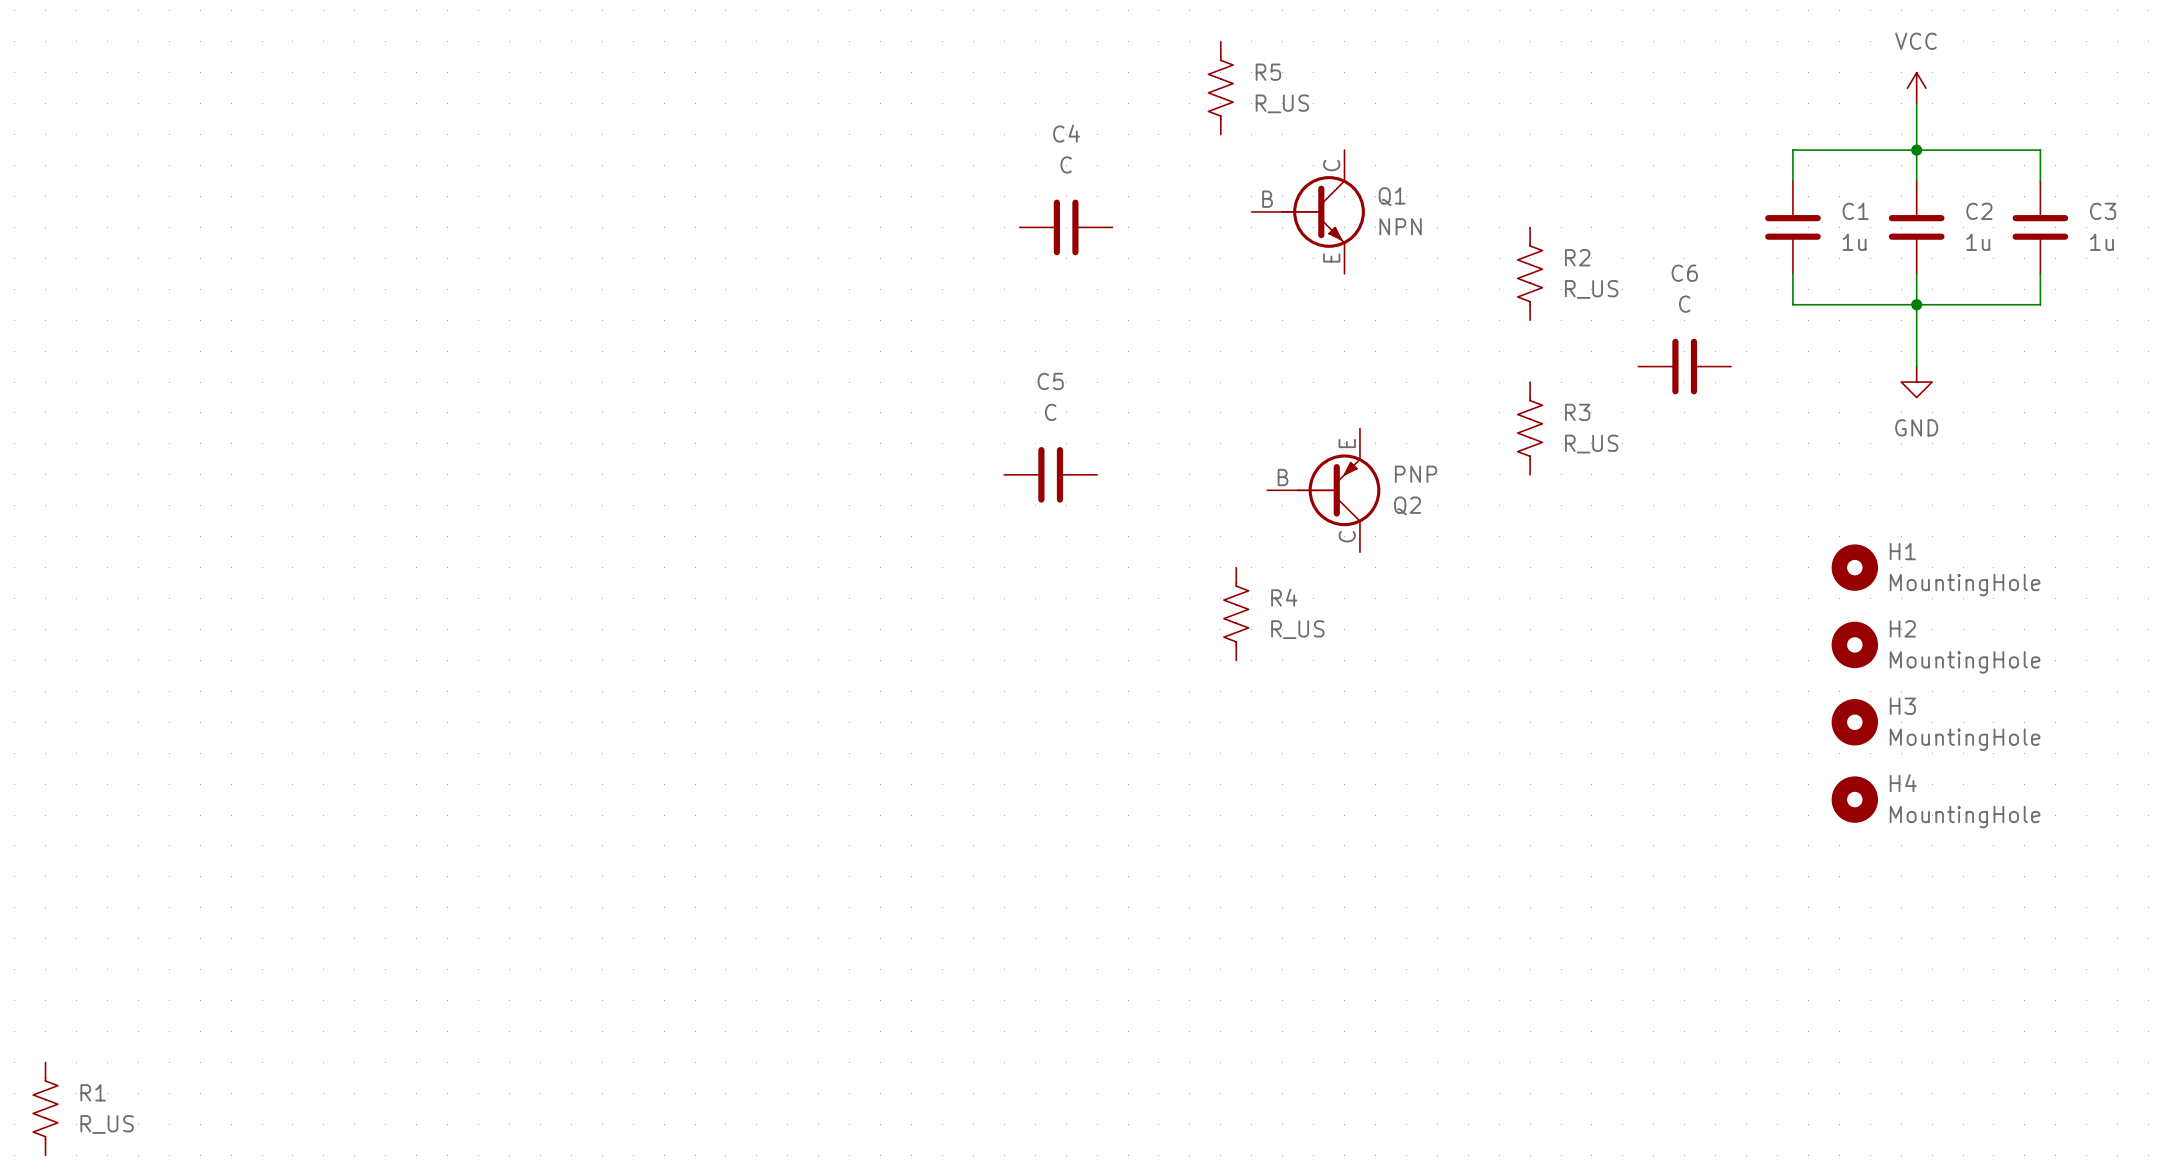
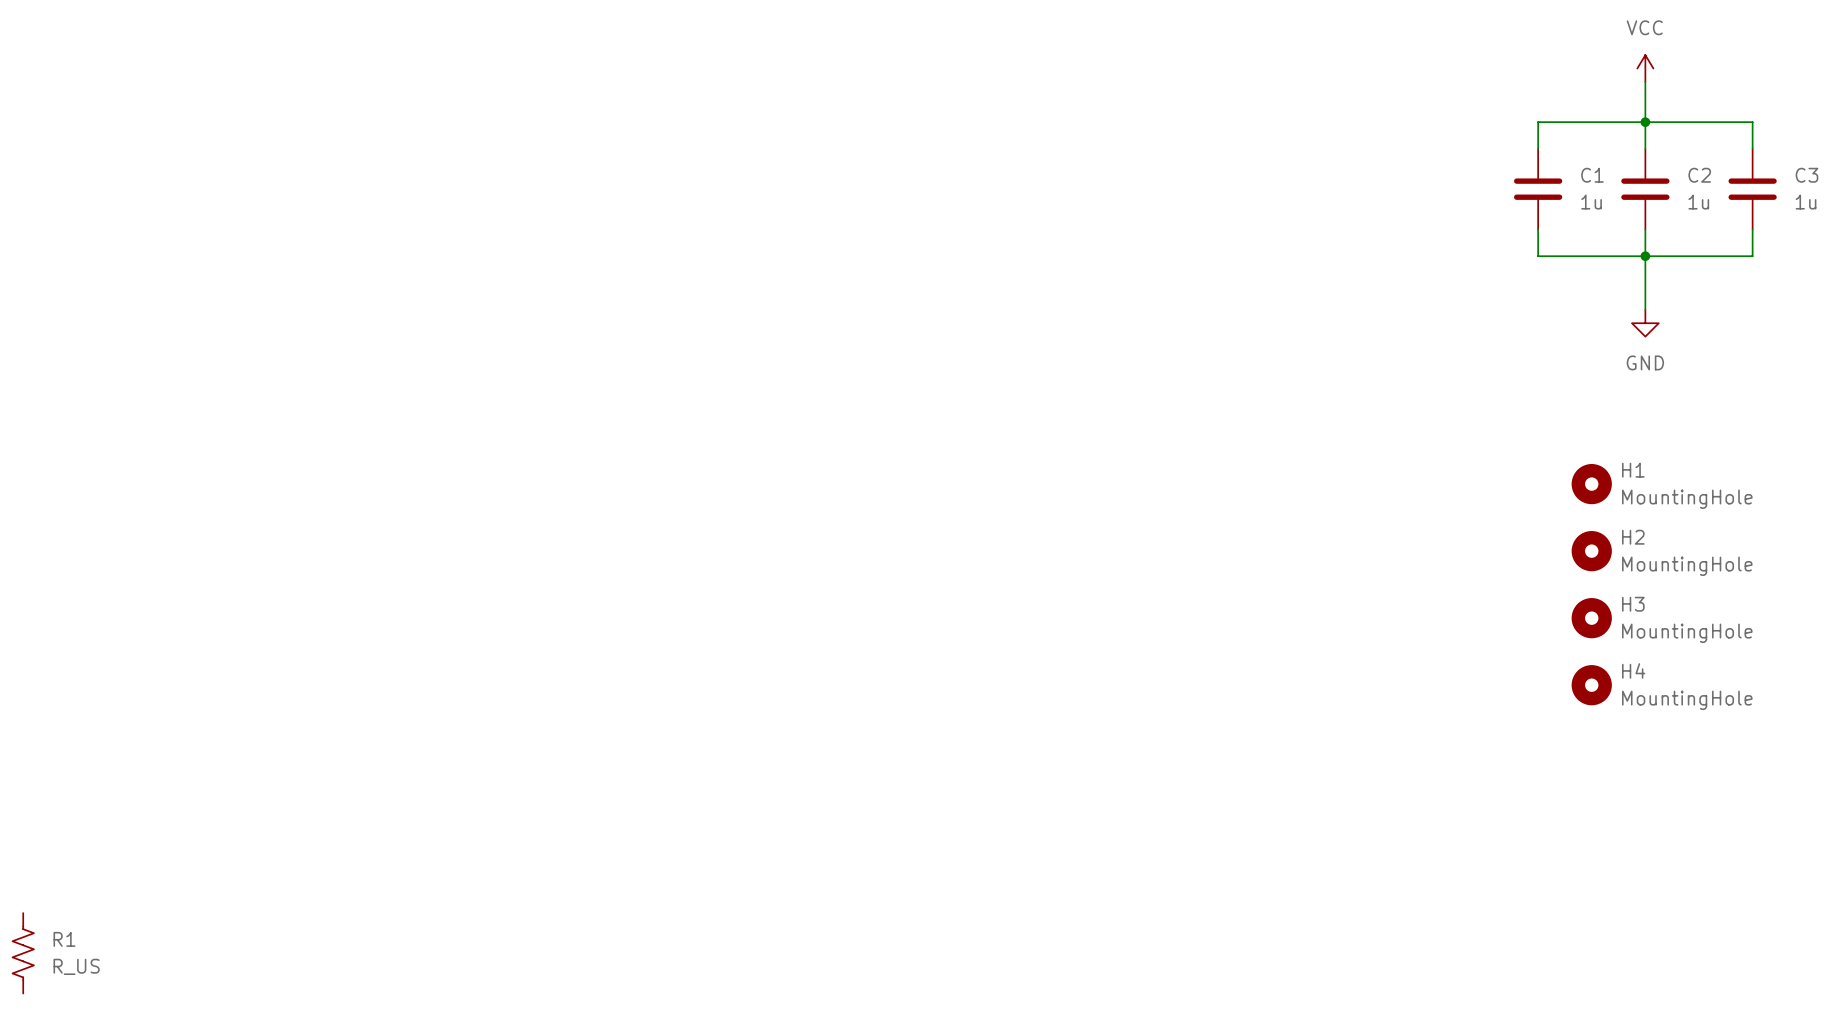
R5: R_US (1220, 88) -> none
Q1: NPN (1308, 211) -> none
C4: C (1066, 227) -> none
R2: R_US (1530, 273) -> none
C6: C (1684, 366) -> none
R3: R_US (1530, 428) -> none
C5: C (1050, 474) -> none
Q2: PNP (1323, 490) -> none
R4: R_US (1236, 614) -> none

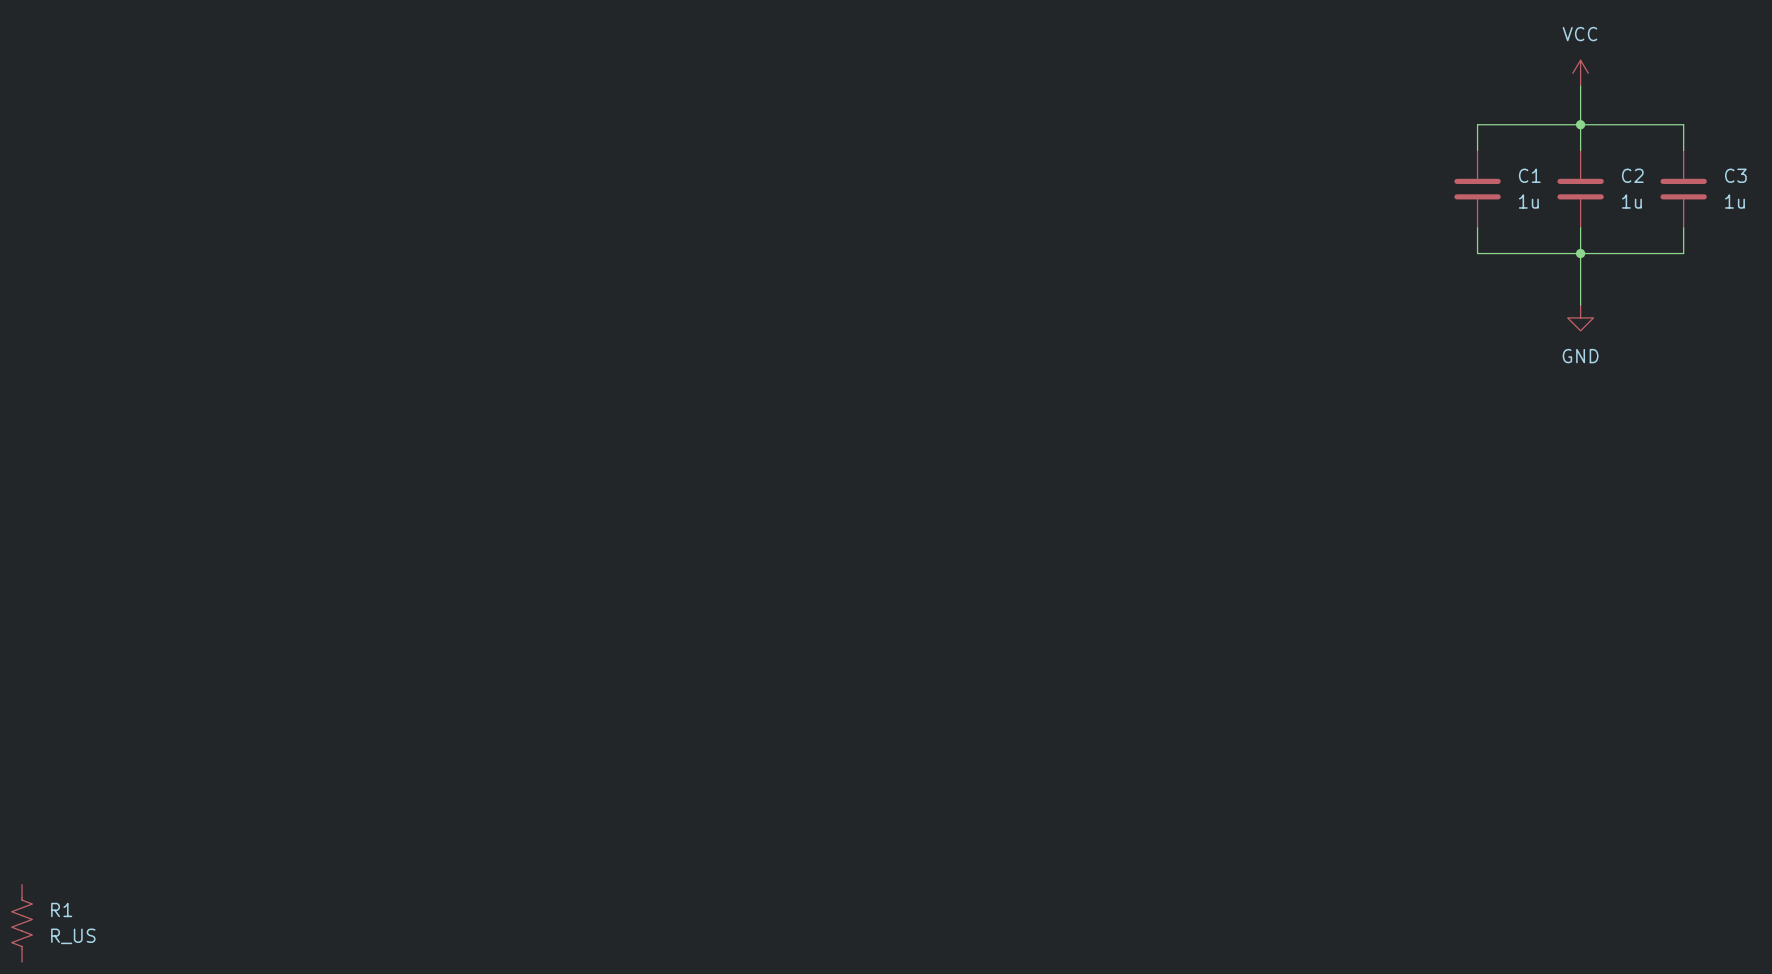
H1: MountingHole (1591, 484) -> none
H2: MountingHole (1591, 551) -> none
H3: MountingHole (1591, 618) -> none
H4: MountingHole (1591, 685) -> none

